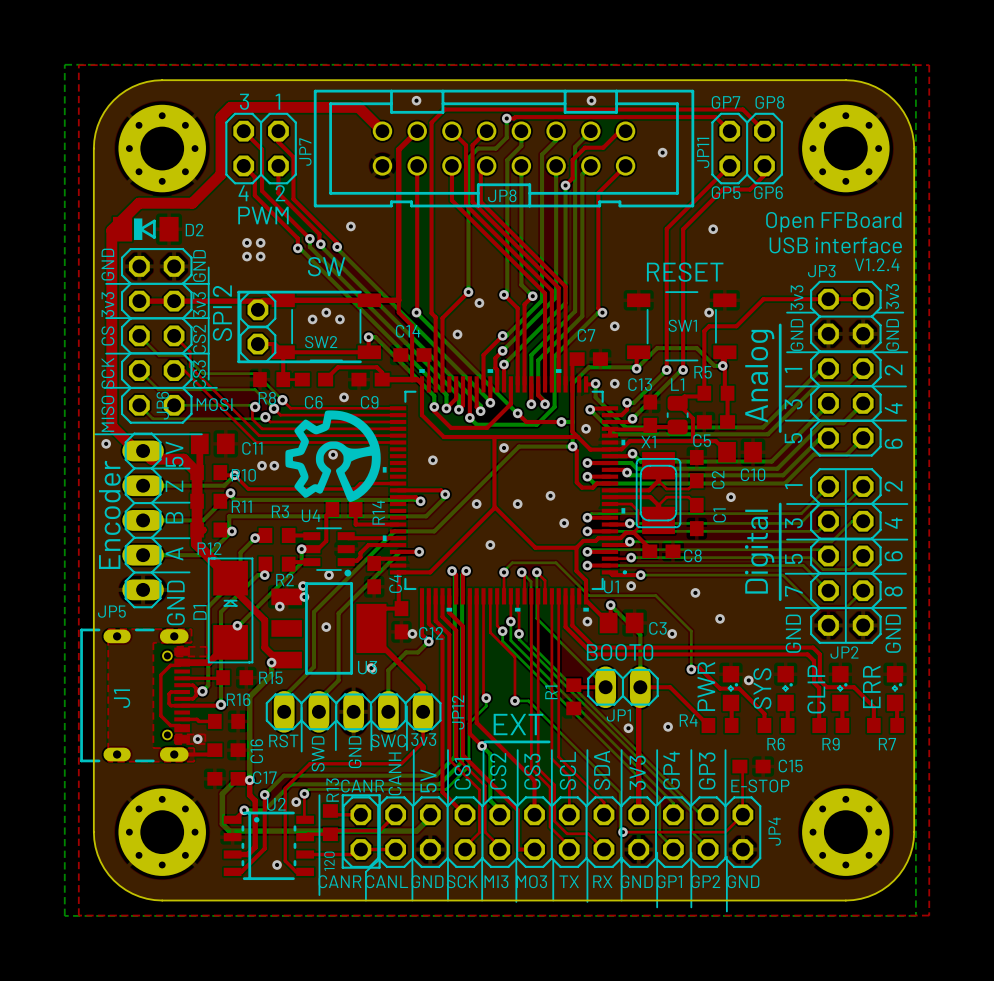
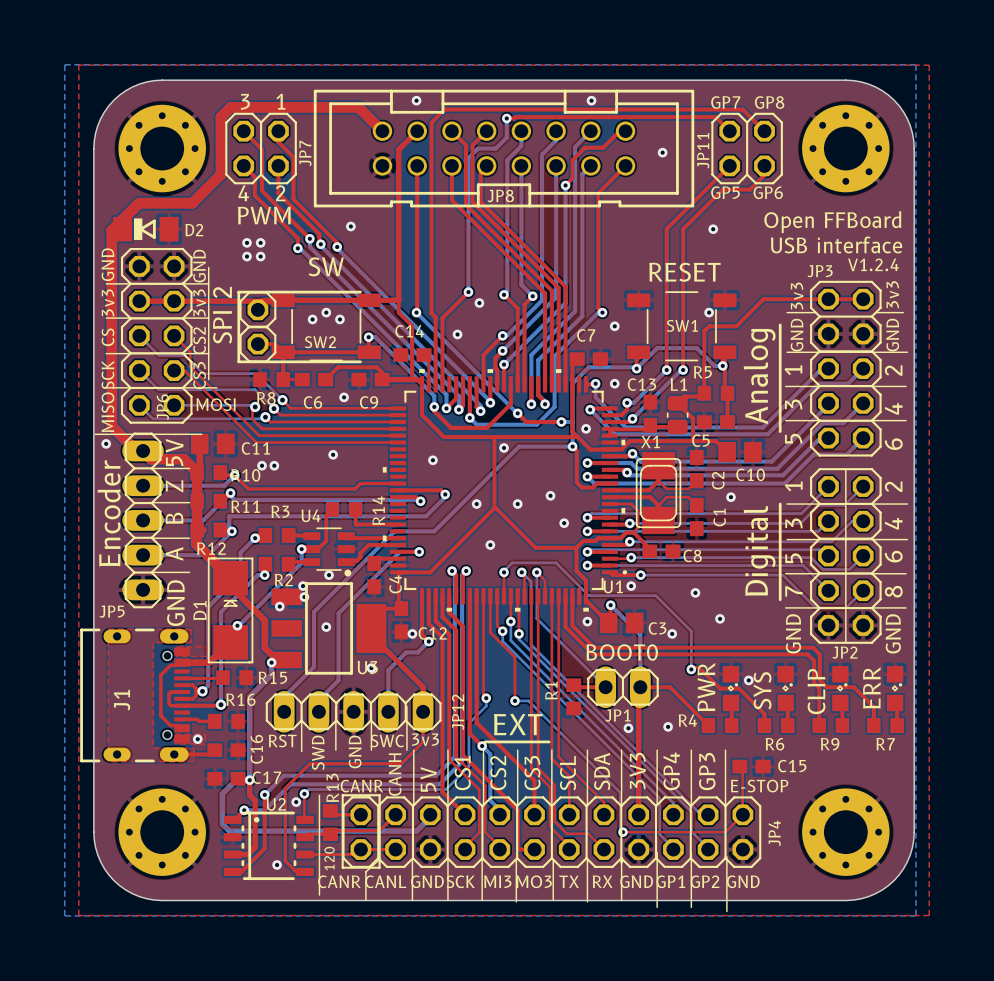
drawing: [285, 410, 381, 503] -> none

